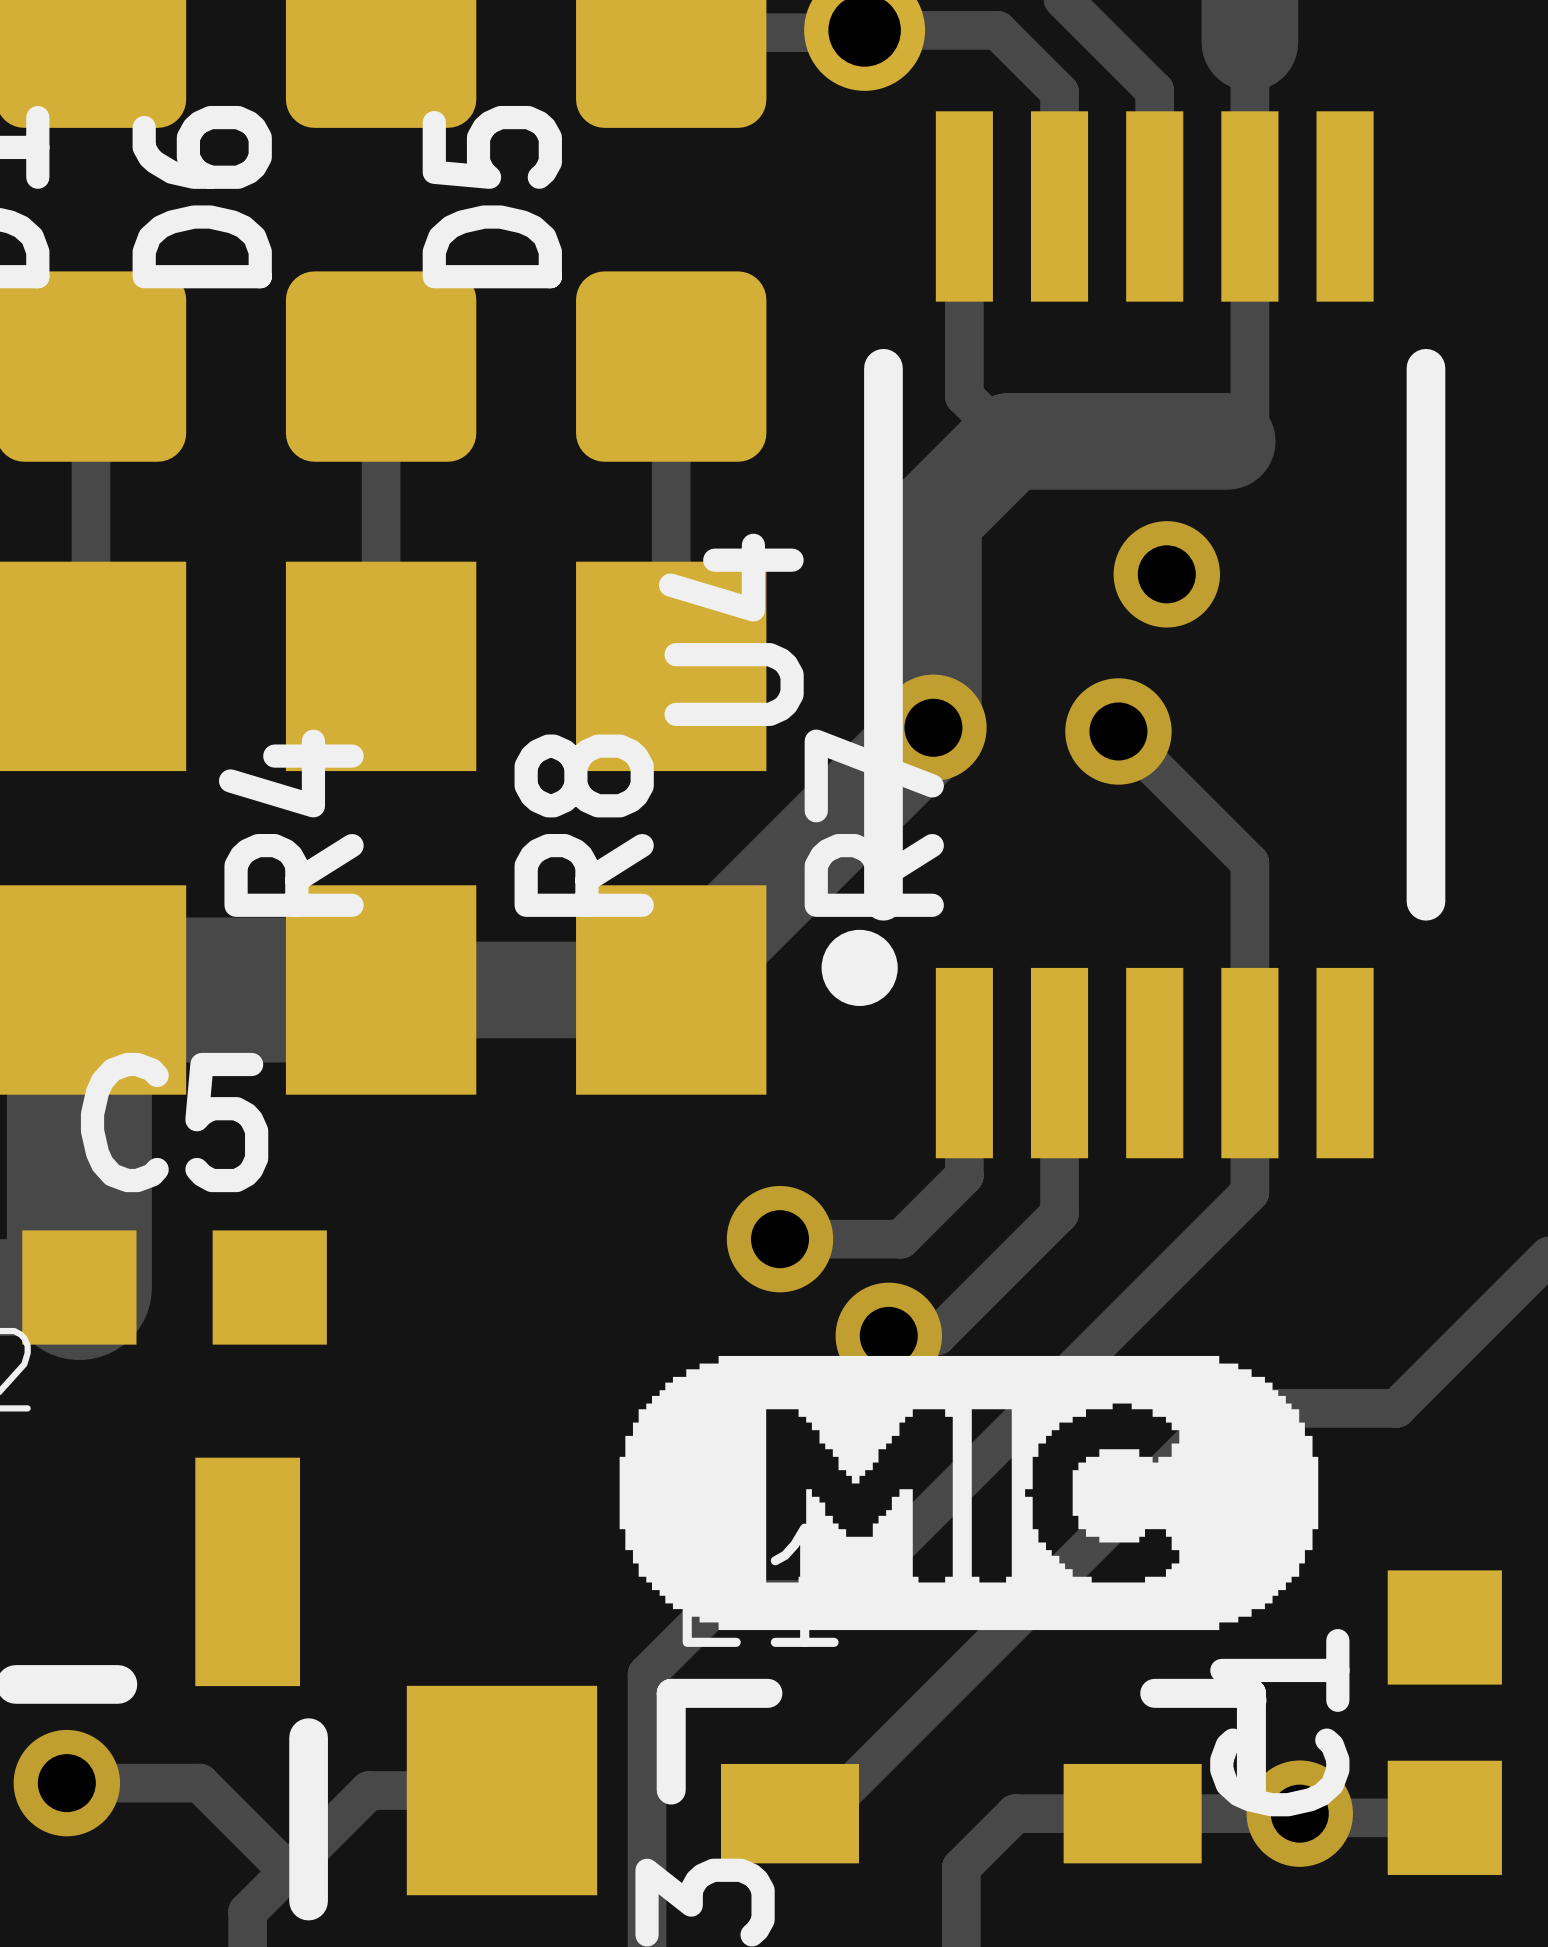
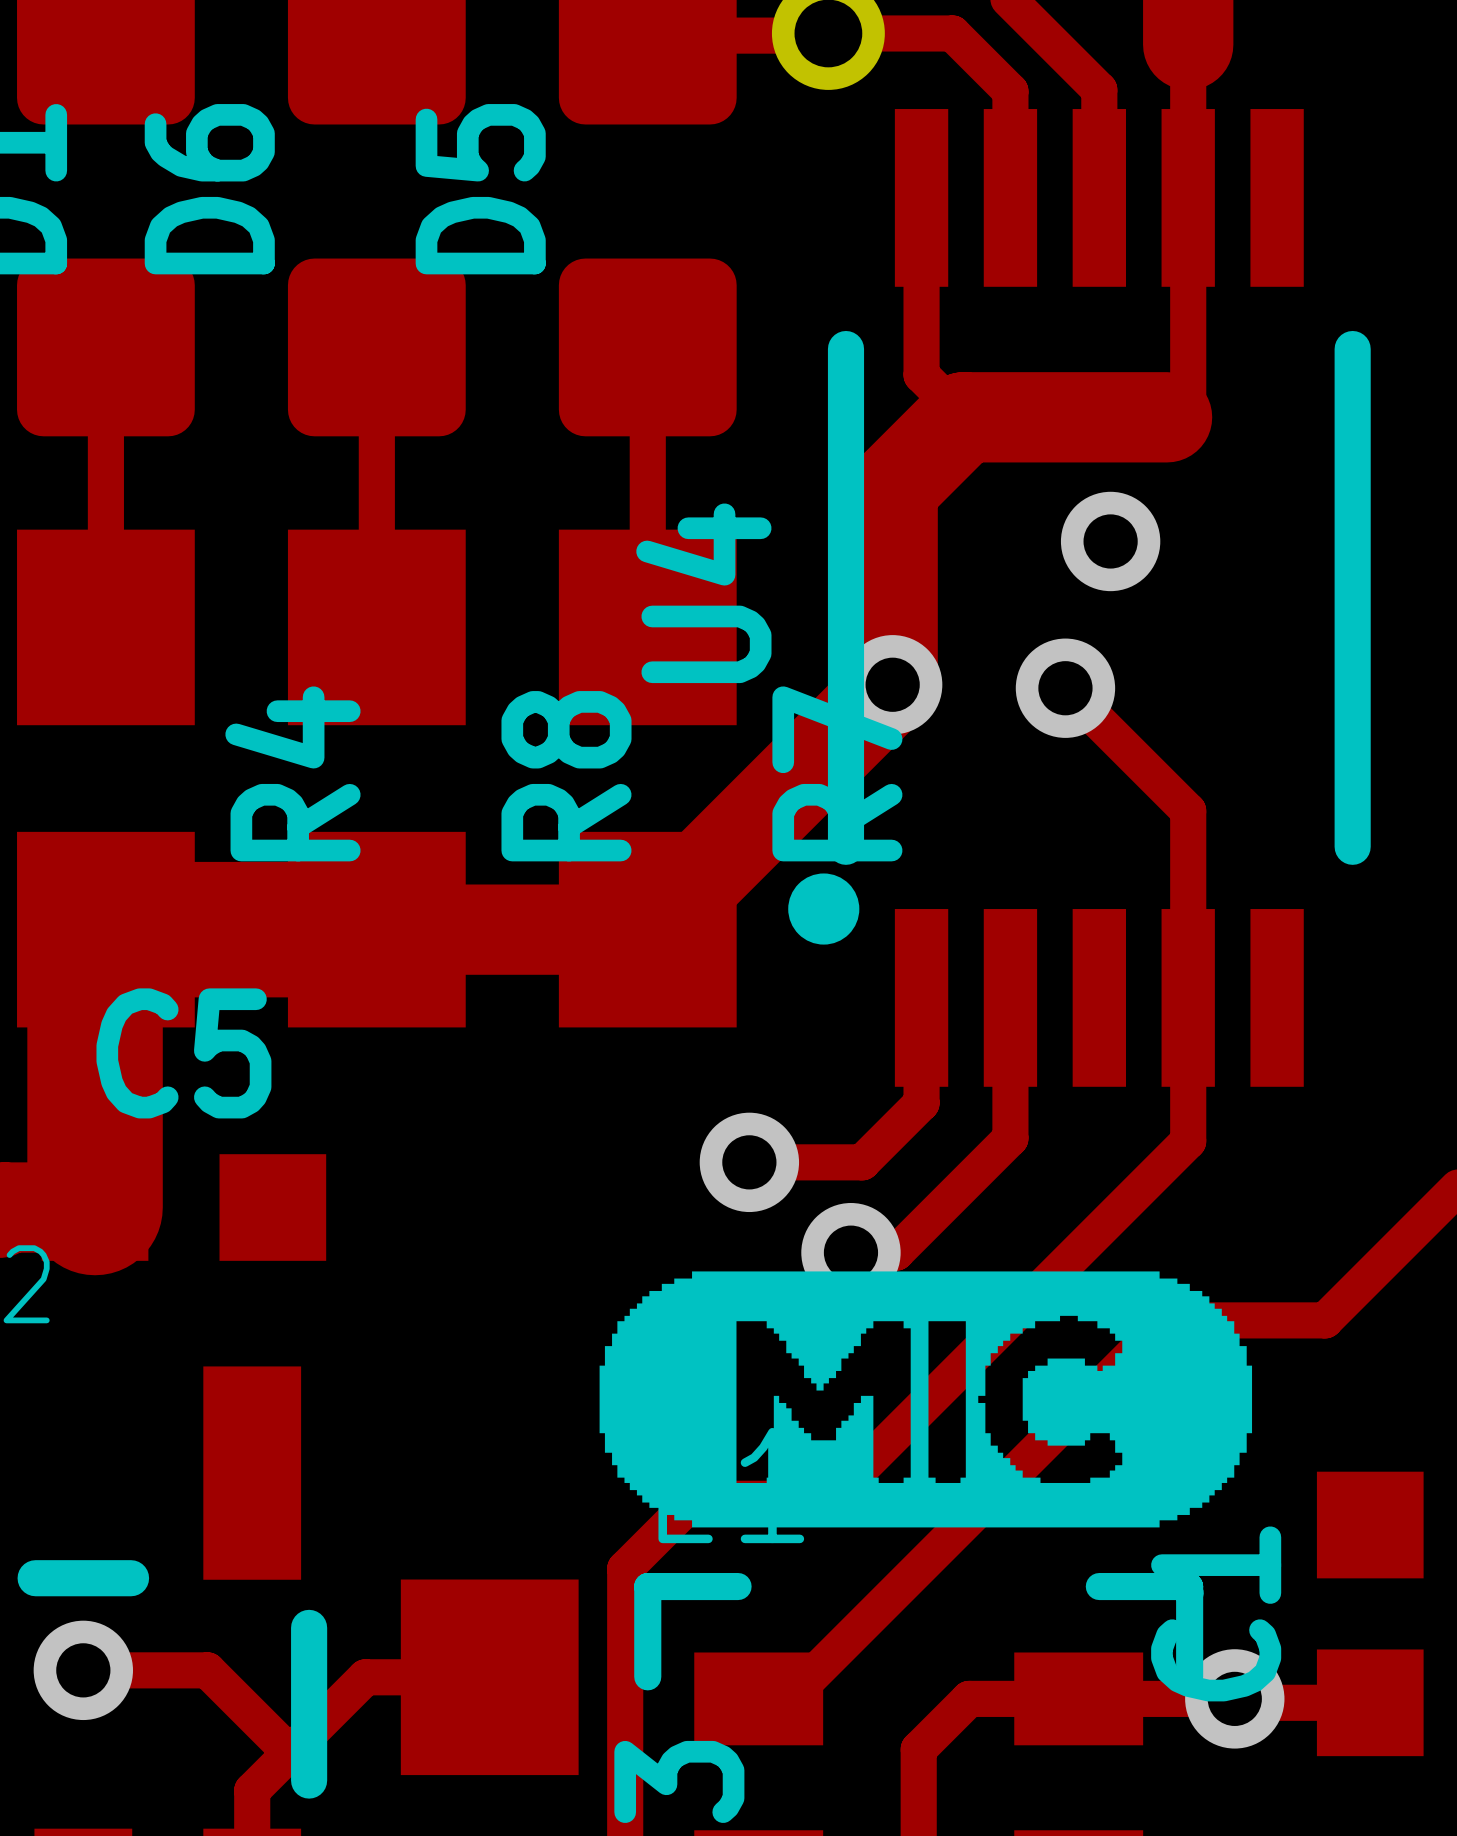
track: (1249, 1192) (842, 1599) -> (1188, 1118) (1188, 1141) (830, 1498) (808, 1498)

